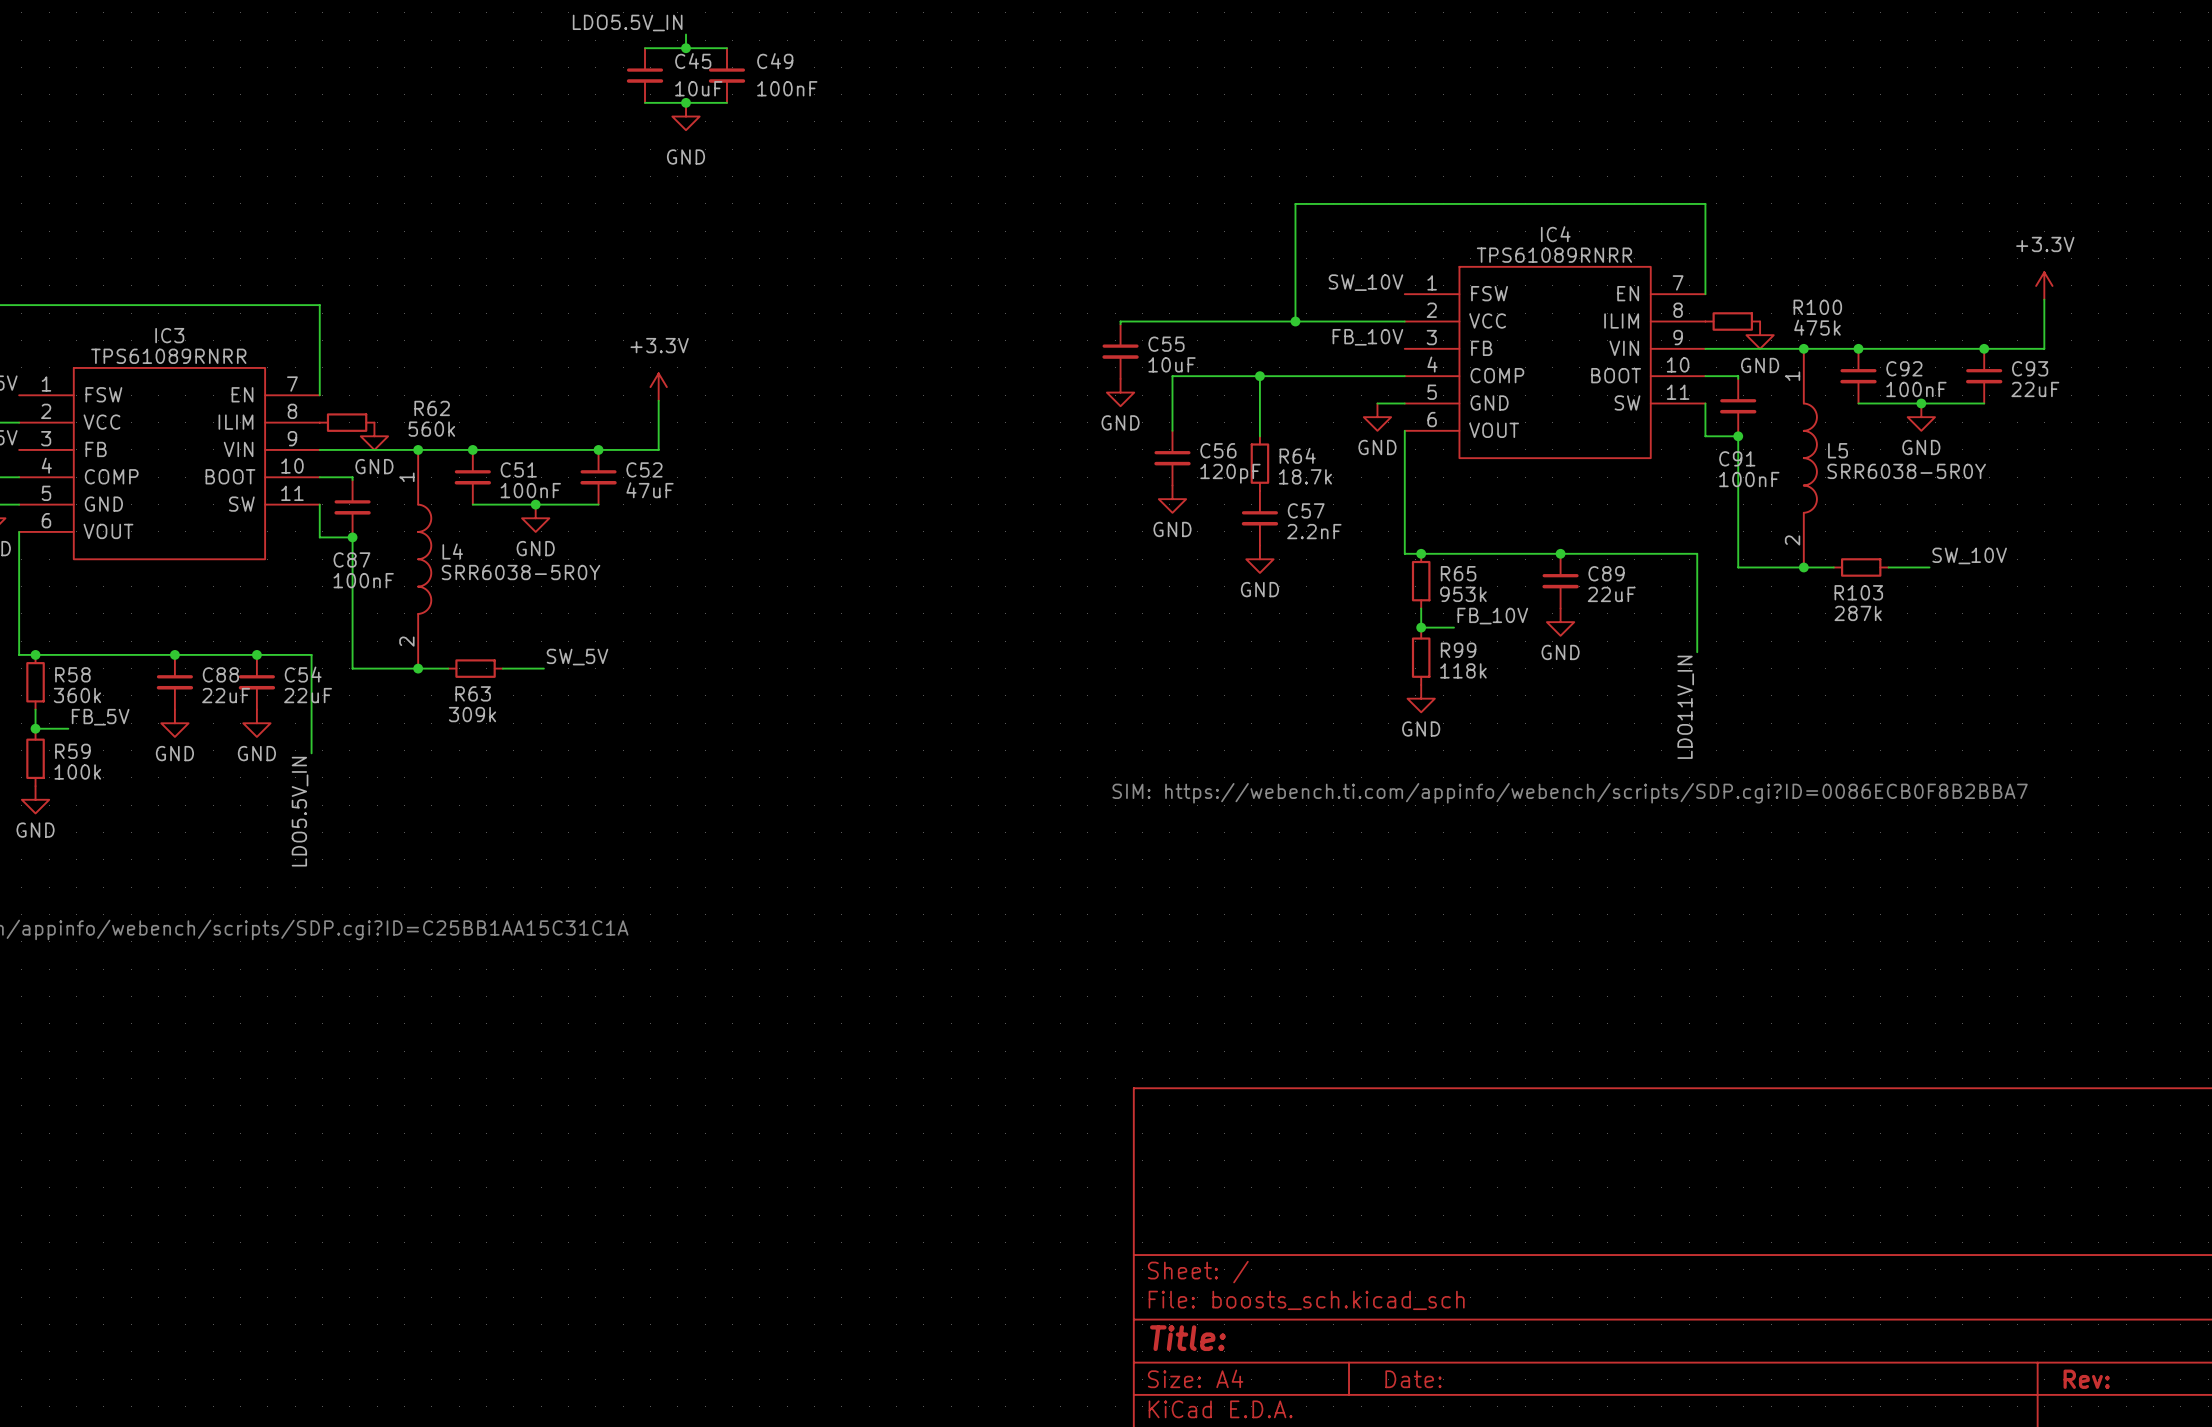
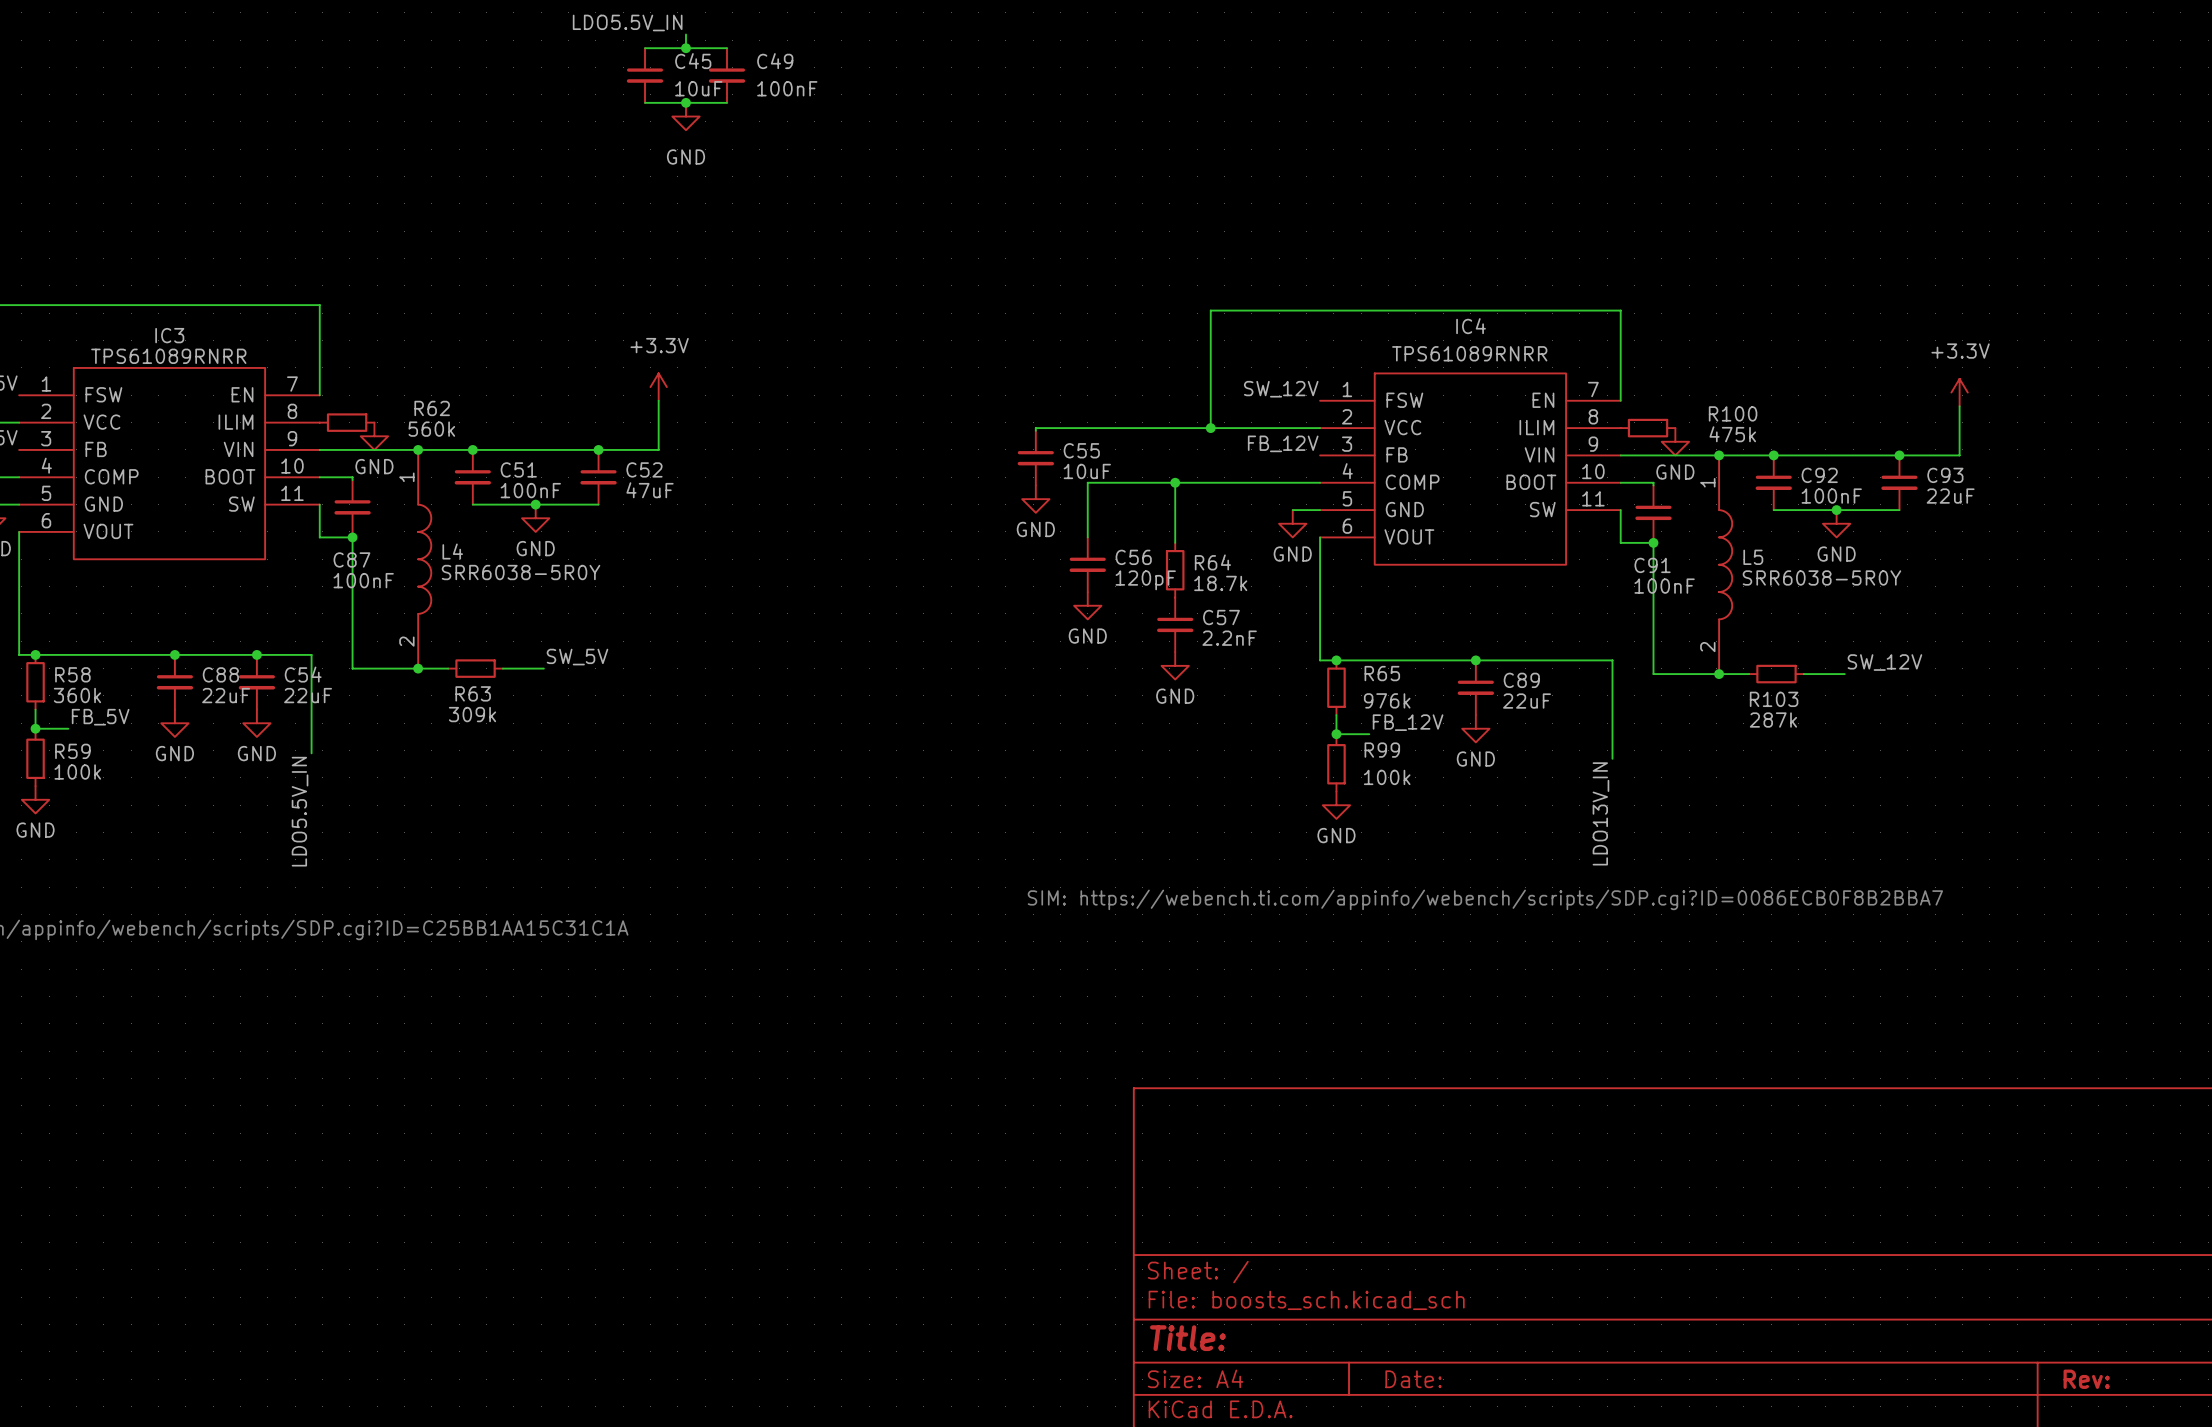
IC4 name position: IC4 (1555, 234) -> IC4 (1471, 326)
IC4 value position: TPS61089RNRR (1554, 255) -> TPS61089RNRR (1469, 353)
label: SW_10V (1365, 282) -> none
power symbol position: +3.3V (2044, 285) -> +3.3V (1959, 392)
wire: (1705, 294) (1705, 203) (1295, 203) (1295, 321) -> (1620, 400) (1620, 310) (1210, 310) (1210, 428)
wire: (2044, 299) (2044, 348) (1705, 348) -> (1959, 406) (1959, 455) (1620, 455)
junction: (1295, 321) -> none
wire: (1404, 321) (1120, 321) (1120, 324) -> (1320, 428) (1035, 428) (1035, 430)
R100 position: (1732, 321) -> (1648, 428)
power symbol: GND (1760, 335) -> none
label: FB_10V (1367, 337) -> none
junction: (1803, 348) -> none
junction: (1858, 348) -> none
junction: (1984, 348) -> none
C55 position: (1120, 351) -> (1035, 458)
IC4 position: (1555, 362) -> (1470, 469)
wire: (1259, 376) (1259, 436) -> (1175, 482) (1175, 542)
junction: (1259, 376) -> none
wire: (1404, 376) (1172, 376) (1172, 430) -> (1320, 482) (1087, 482) (1087, 537)
wire: (1705, 376) (1738, 376) (1738, 378) -> (1620, 482) (1653, 482) (1653, 485)
C92 position: (1858, 376) -> (1773, 482)
C93 position: (1984, 376) -> (1899, 482)
label: none -> SW_12V (1281, 389)
power symbol: GND (1120, 392) -> none
wire: (1377, 403) (1404, 403) -> (1292, 510) (1320, 510)
wire: (1705, 403) (1705, 436) (1738, 436) -> (1620, 510) (1620, 542) (1653, 542)
wire: (1858, 403) (1984, 403) -> (1773, 510) (1899, 510)
junction position: (1921, 403) -> (1899, 455)
C91 position: (1738, 406) -> (1653, 512)
power symbol: GND (1377, 417) -> none
power symbol: GND (1921, 417) -> none
junction: none -> (1210, 428)
wire: (1404, 430) (1404, 553) (1697, 553) (1697, 652) -> (1320, 537) (1320, 660) (1612, 660) (1612, 758)
wire: (1738, 433) (1738, 567) (1833, 567) -> (1653, 540) (1653, 674) (1749, 674)
junction: (1738, 436) -> none
power symbol: none -> GND (1675, 441)
label: none -> FB_12V (1283, 443)
junction: none -> (1719, 455)
junction: none -> (1773, 455)
C56 position: (1172, 458) -> (1087, 564)
L5 position: (1810, 458) -> (1725, 564)
R64 position: (1259, 463) -> (1175, 570)
junction: none -> (1175, 482)
power symbol: none -> GND (1035, 499)
power symbol: GND (1172, 499) -> none
junction: none -> (1836, 510)
C57 position: (1259, 518) -> (1175, 624)
power symbol: none -> GND (1836, 523)
junction: none -> (1653, 542)
junction: (1421, 553) -> none
junction: (1560, 553) -> none
label: SW_10V (1969, 555) -> none
power symbol position: GND (1259, 559) -> GND (1292, 523)
junction: (1803, 567) -> none
R103 position: (1861, 567) -> (1776, 674)
wire: (1888, 567) (1929, 567) -> (1803, 674) (1844, 674)
R65 name position: R65 (1458, 573) -> R65 (1382, 673)
R65 position: (1421, 581) -> (1336, 687)
C89 position: (1560, 581) -> (1475, 687)
R65 value: 953k (1463, 594) -> 976k (1387, 700)
power symbol: none -> GND (1087, 605)
wire: (1421, 608) (1421, 630) -> (1336, 715) (1336, 736)
label: FB_10V (1492, 616) -> none
power symbol: GND (1560, 622) -> none
wire: (1421, 627) (1453, 627) -> (1336, 734) (1369, 734)
junction: (1421, 627) -> none
R99 name position: R99 (1458, 650) -> R99 (1382, 750)
R99 position: (1421, 657) -> (1336, 764)
junction: none -> (1336, 660)
junction: none -> (1475, 660)
label: none -> SW_12V (1884, 662)
power symbol: none -> GND (1175, 665)
R99 value: 118k (1463, 670) -> 100k (1387, 777)
junction: none -> (1719, 674)
power symbol position: GND (1421, 698) -> GND (1475, 728)
label: LDO11V_IN (1685, 707) -> none
label: none -> FB_12V (1408, 722)
junction: none -> (1336, 734)
text position: SIM: https://webench.ti.com/appinfo/webench/scripts/SDP.cgi?ID=0086ECB0F8B2BBA7 (1570, 793) -> SIM: https://webench.ti.com/appinfo/webench/scripts/SDP.cgi?ID=0086ECB0F8B2BBA7 (1485, 899)
power symbol: none -> GND (1336, 805)
label: none -> LDO13V_IN (1600, 813)

